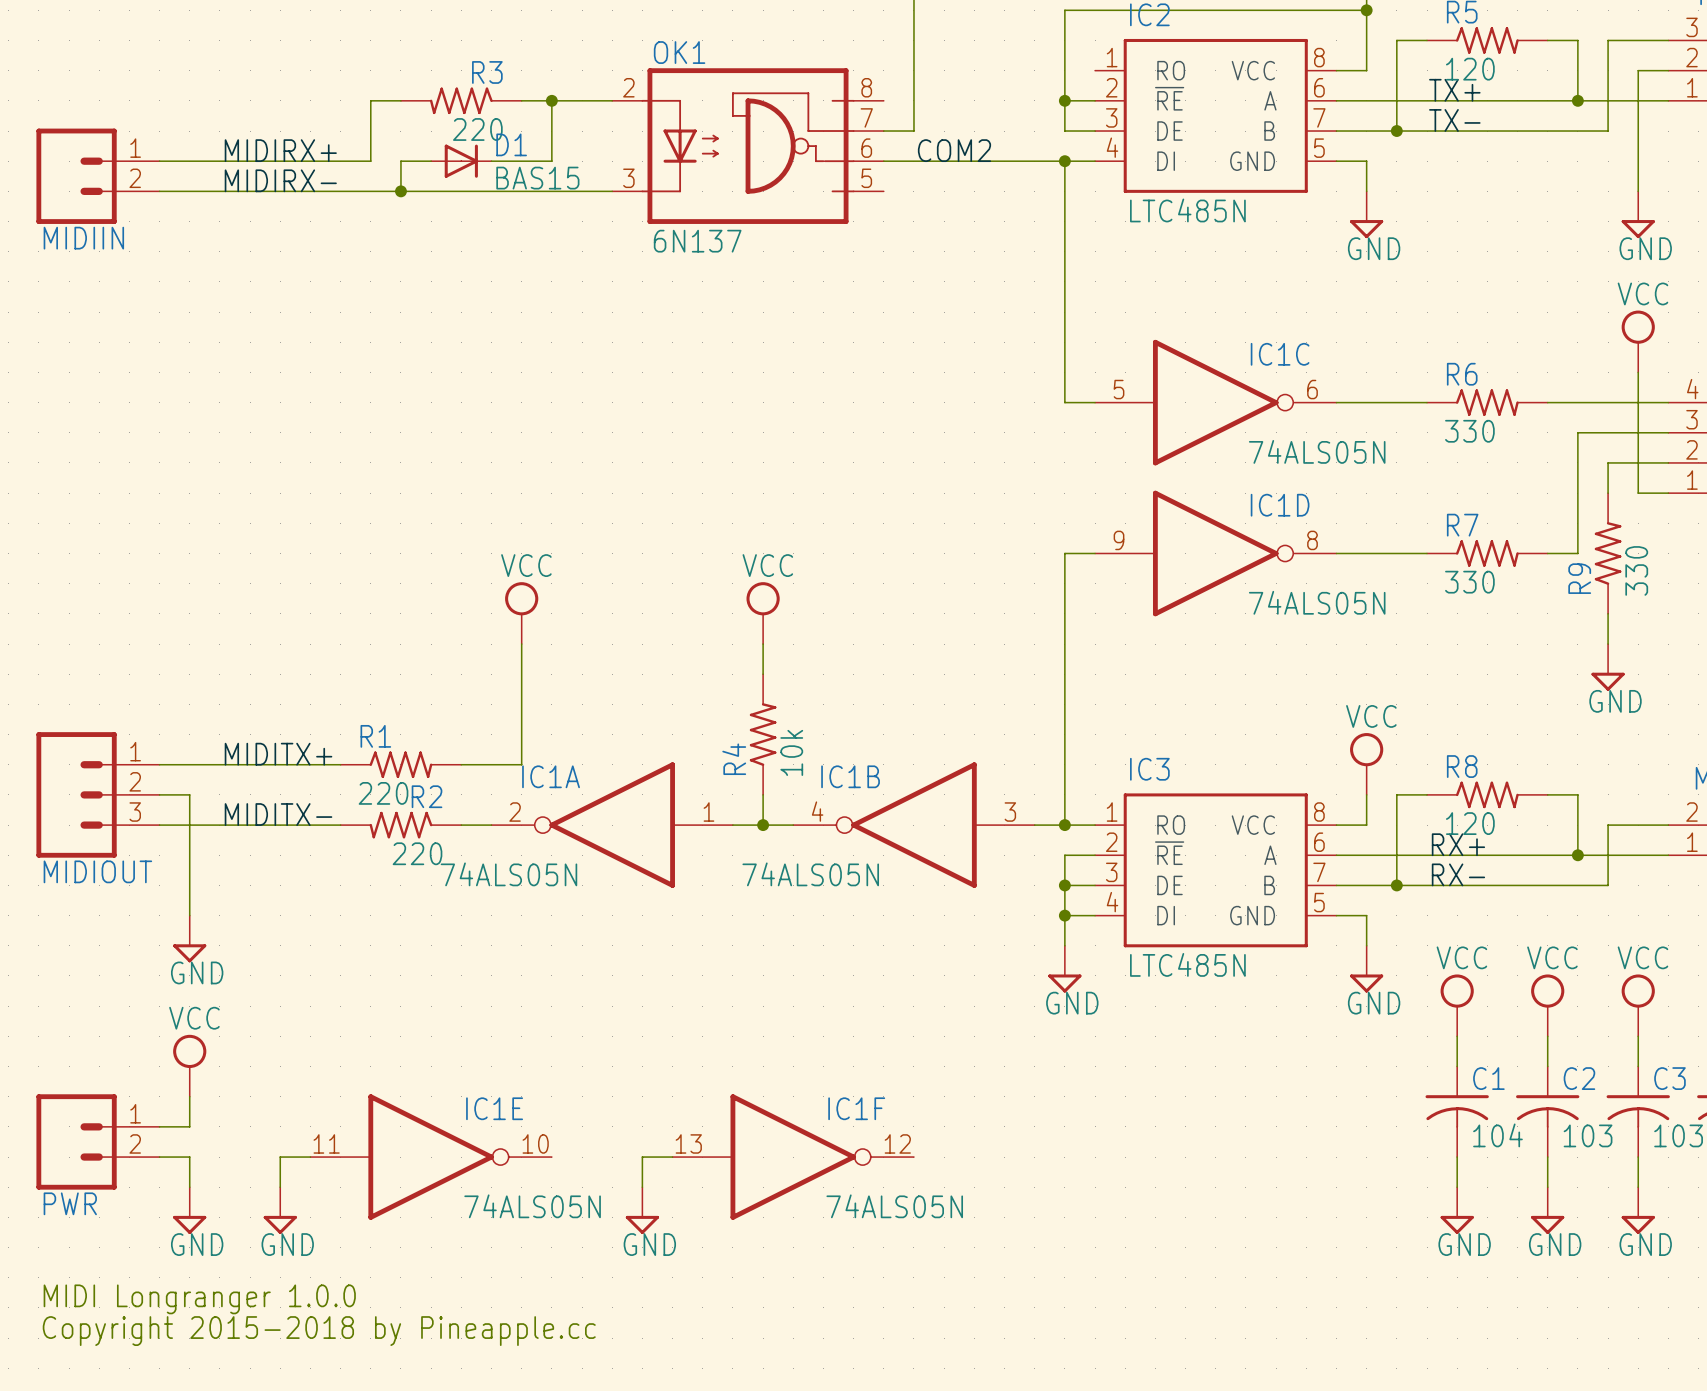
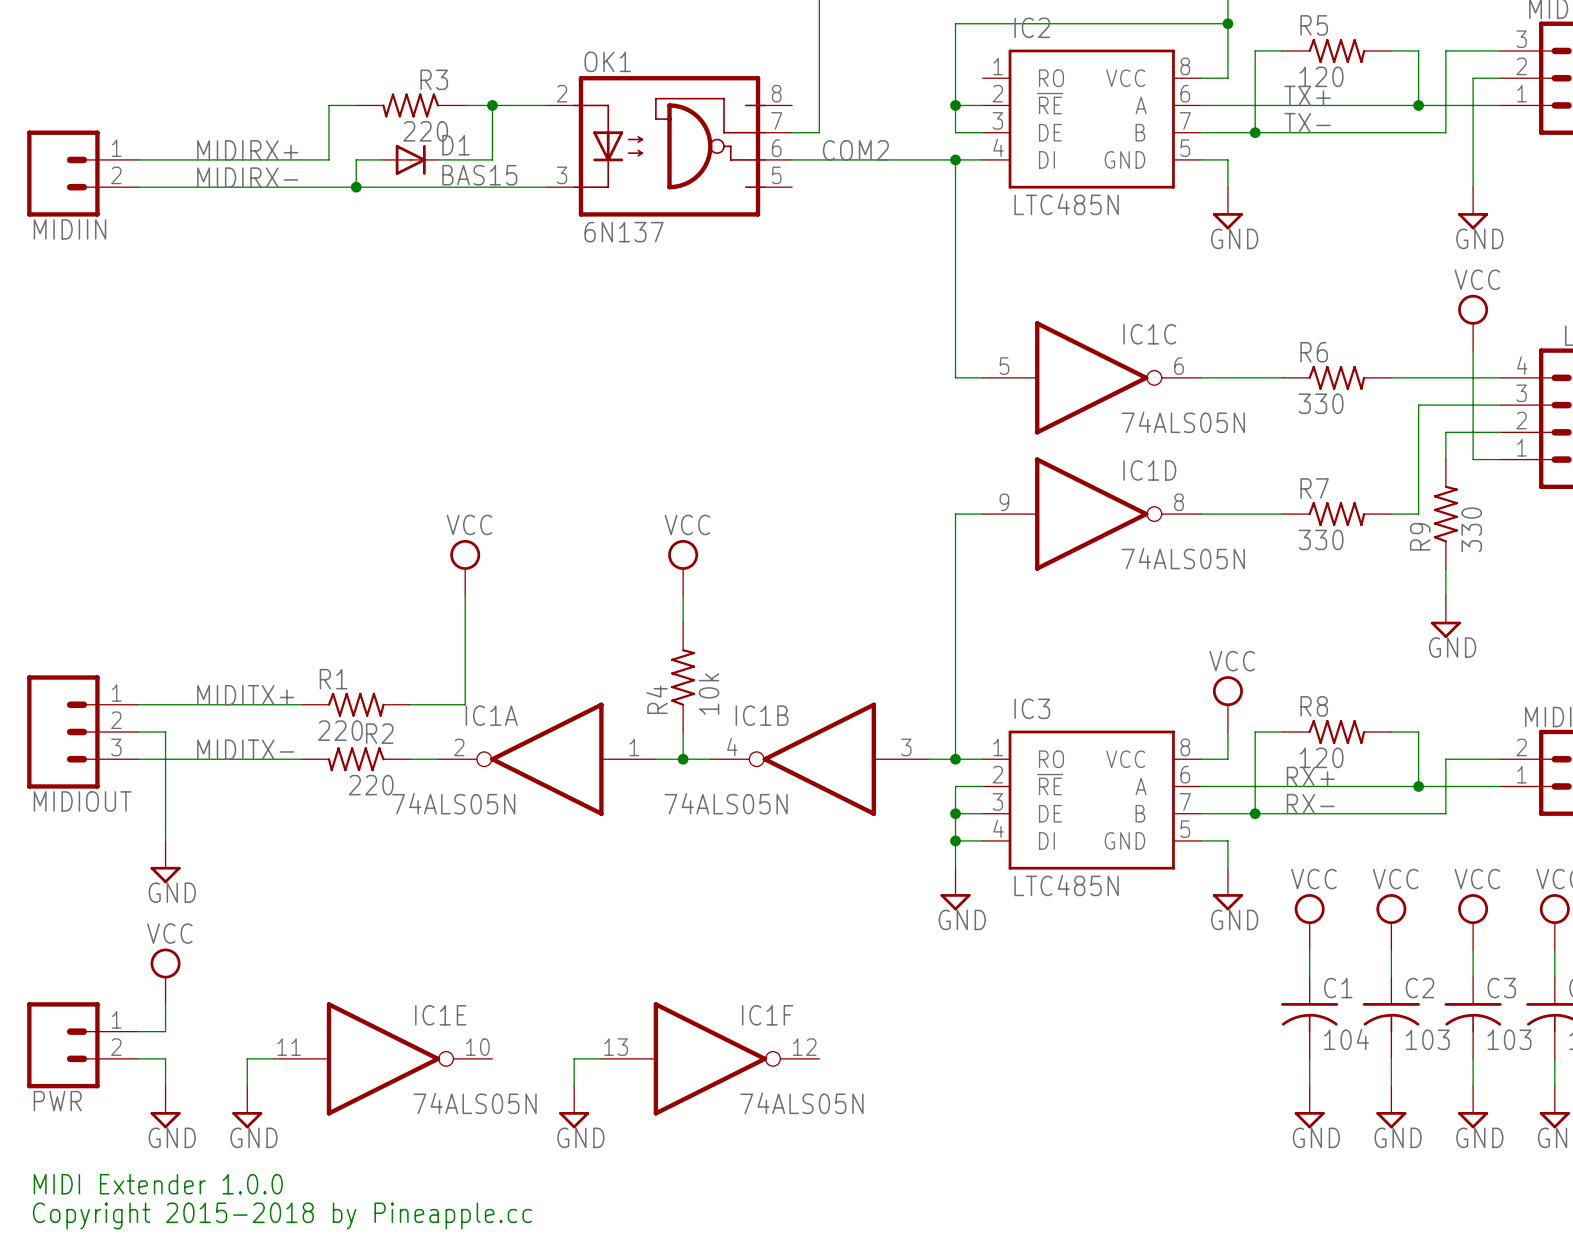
text: MIDI Longranger 1.0.0 (199, 1299) -> MIDI Extender 1.0.0 (158, 1184)

